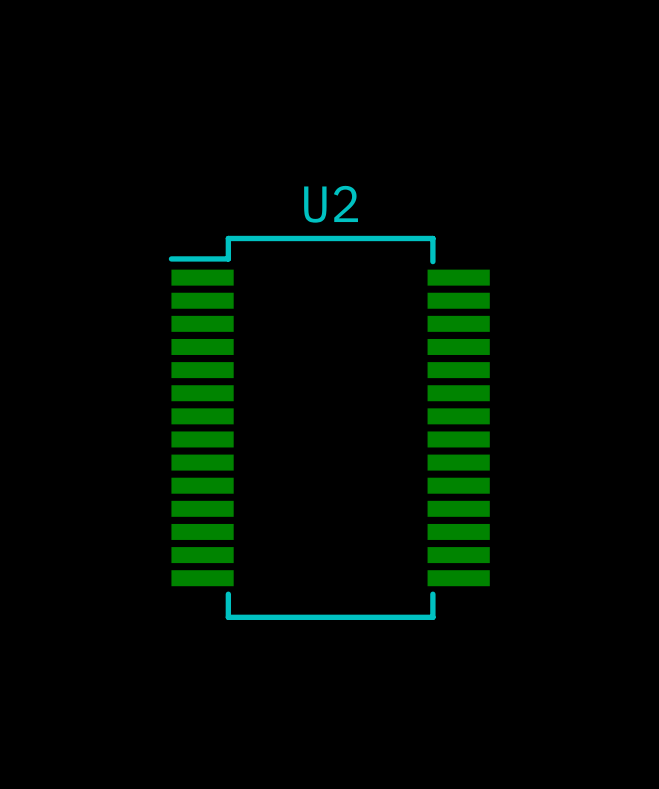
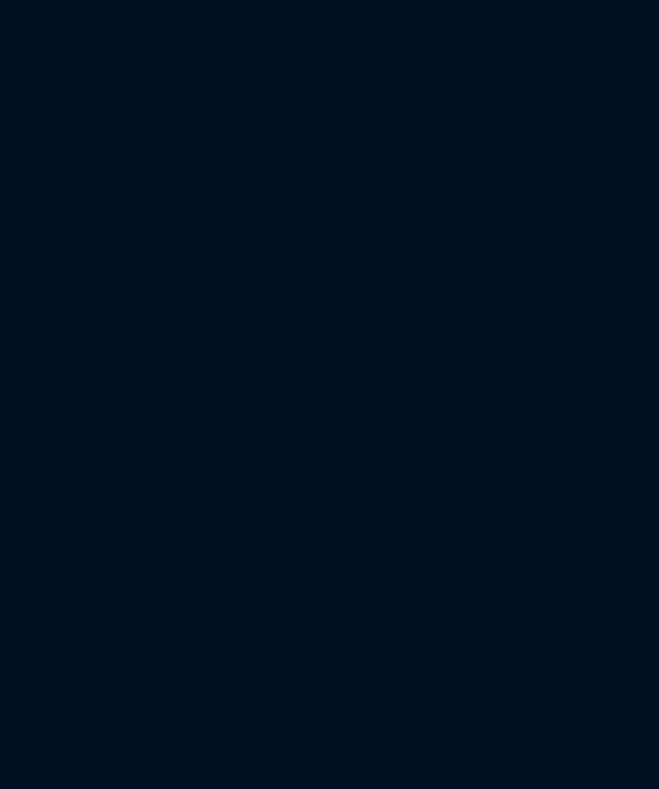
U2: (329, 427) -> none

